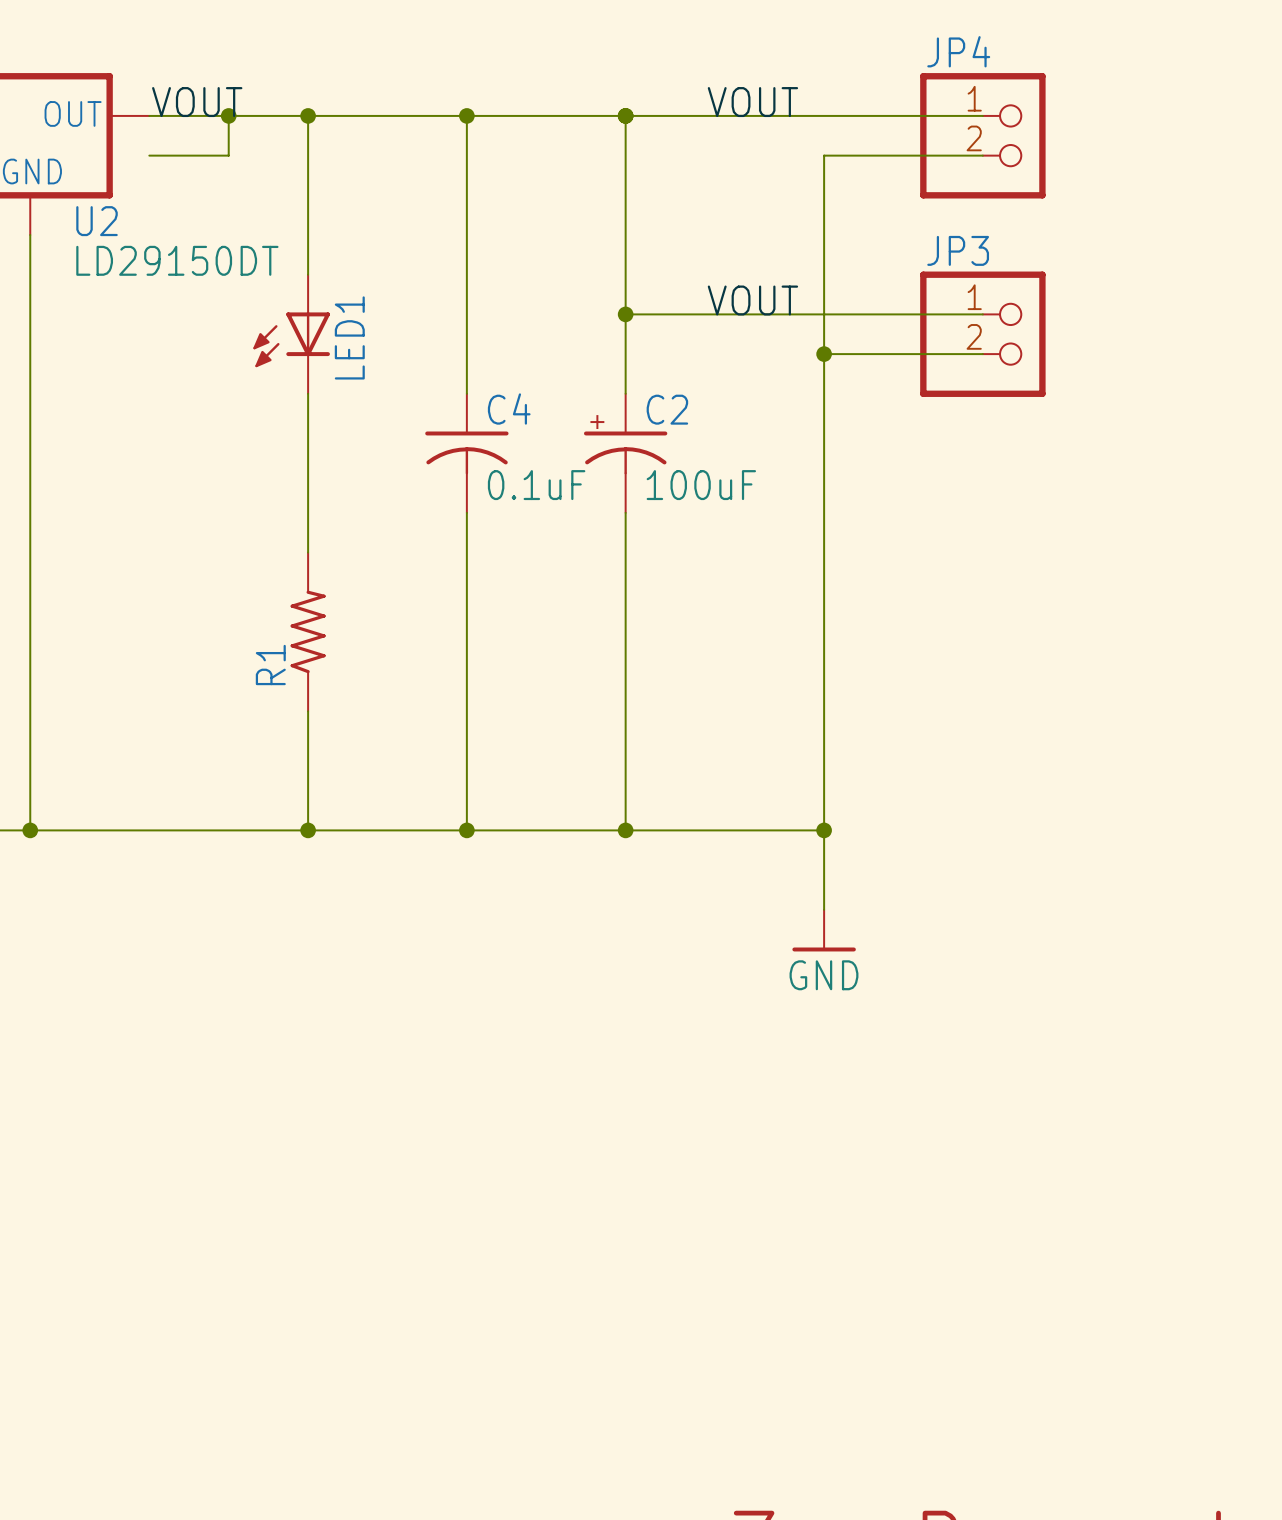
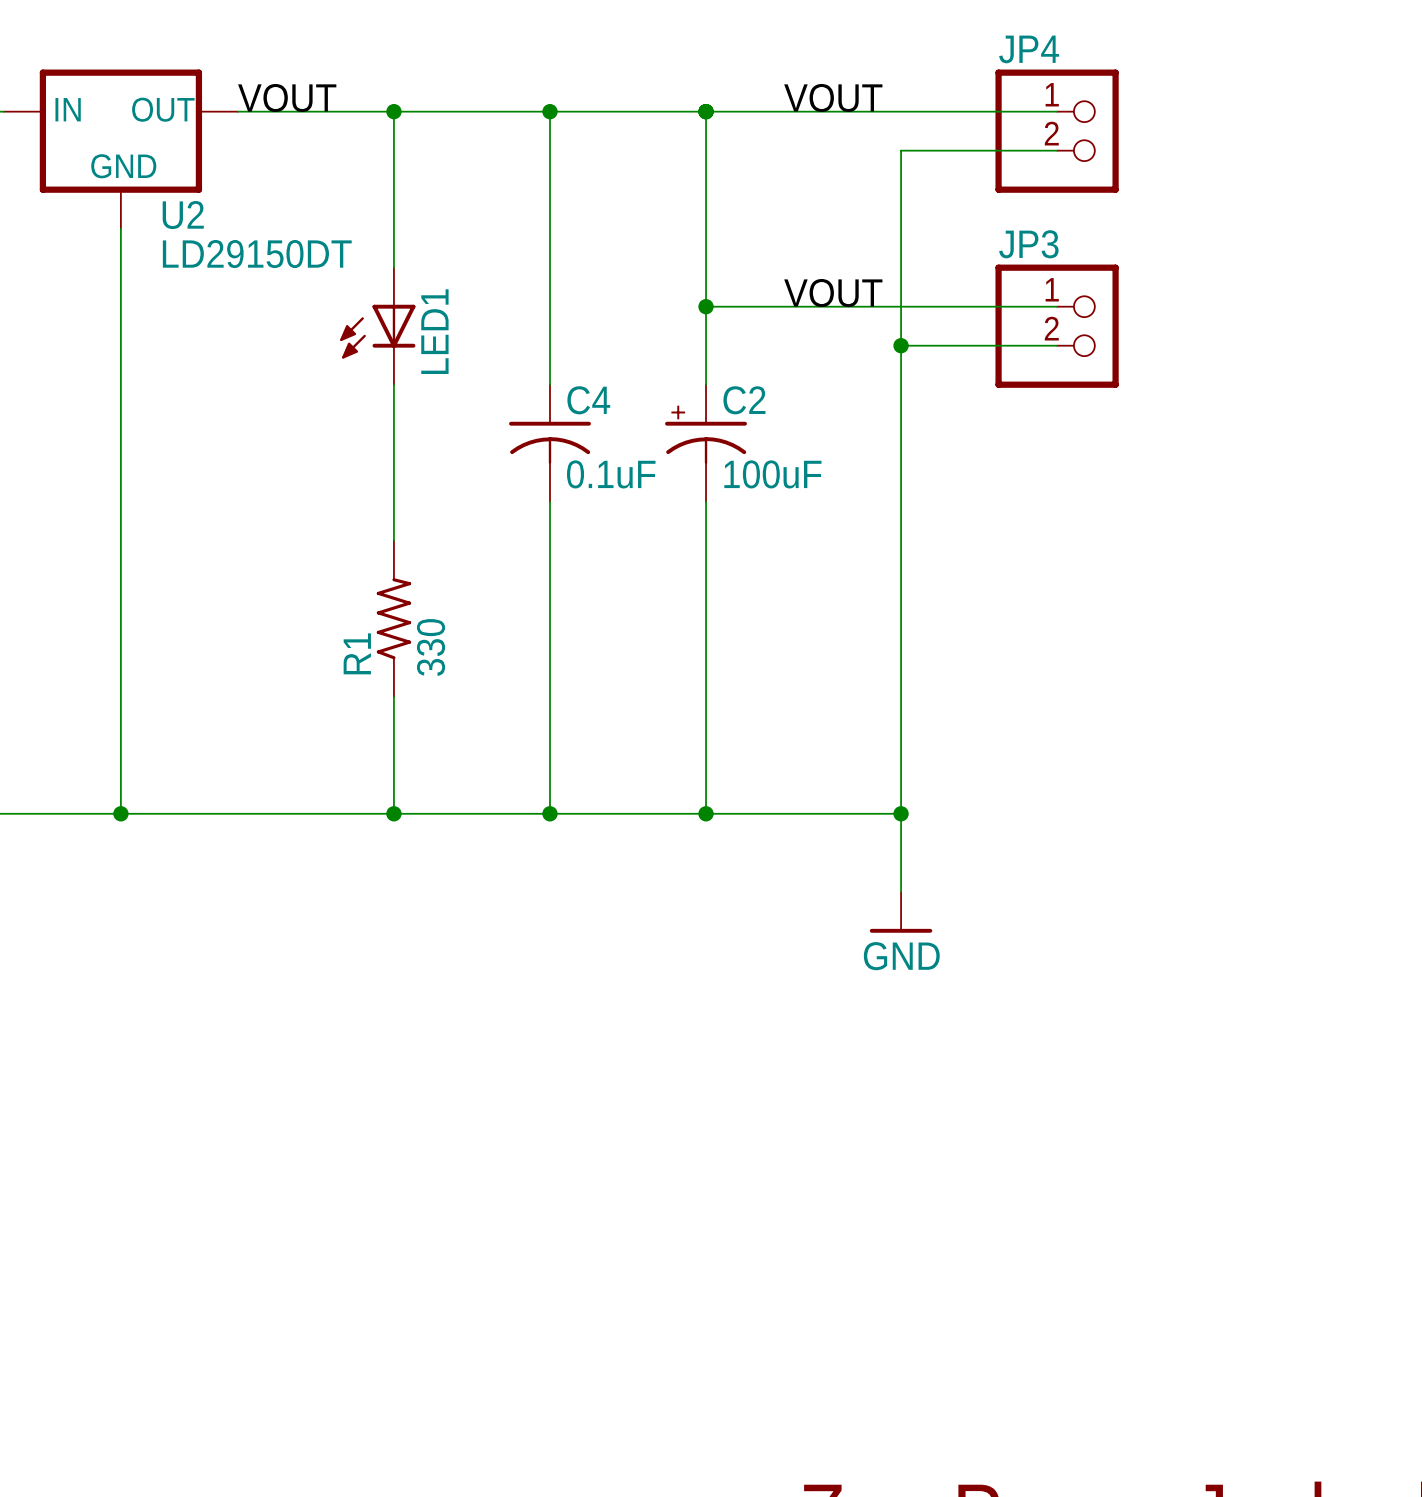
wire: (228, 115) (228, 155) (149, 155) -> none
junction: (228, 115) -> none
R1 value: none -> 330 (431, 647)

